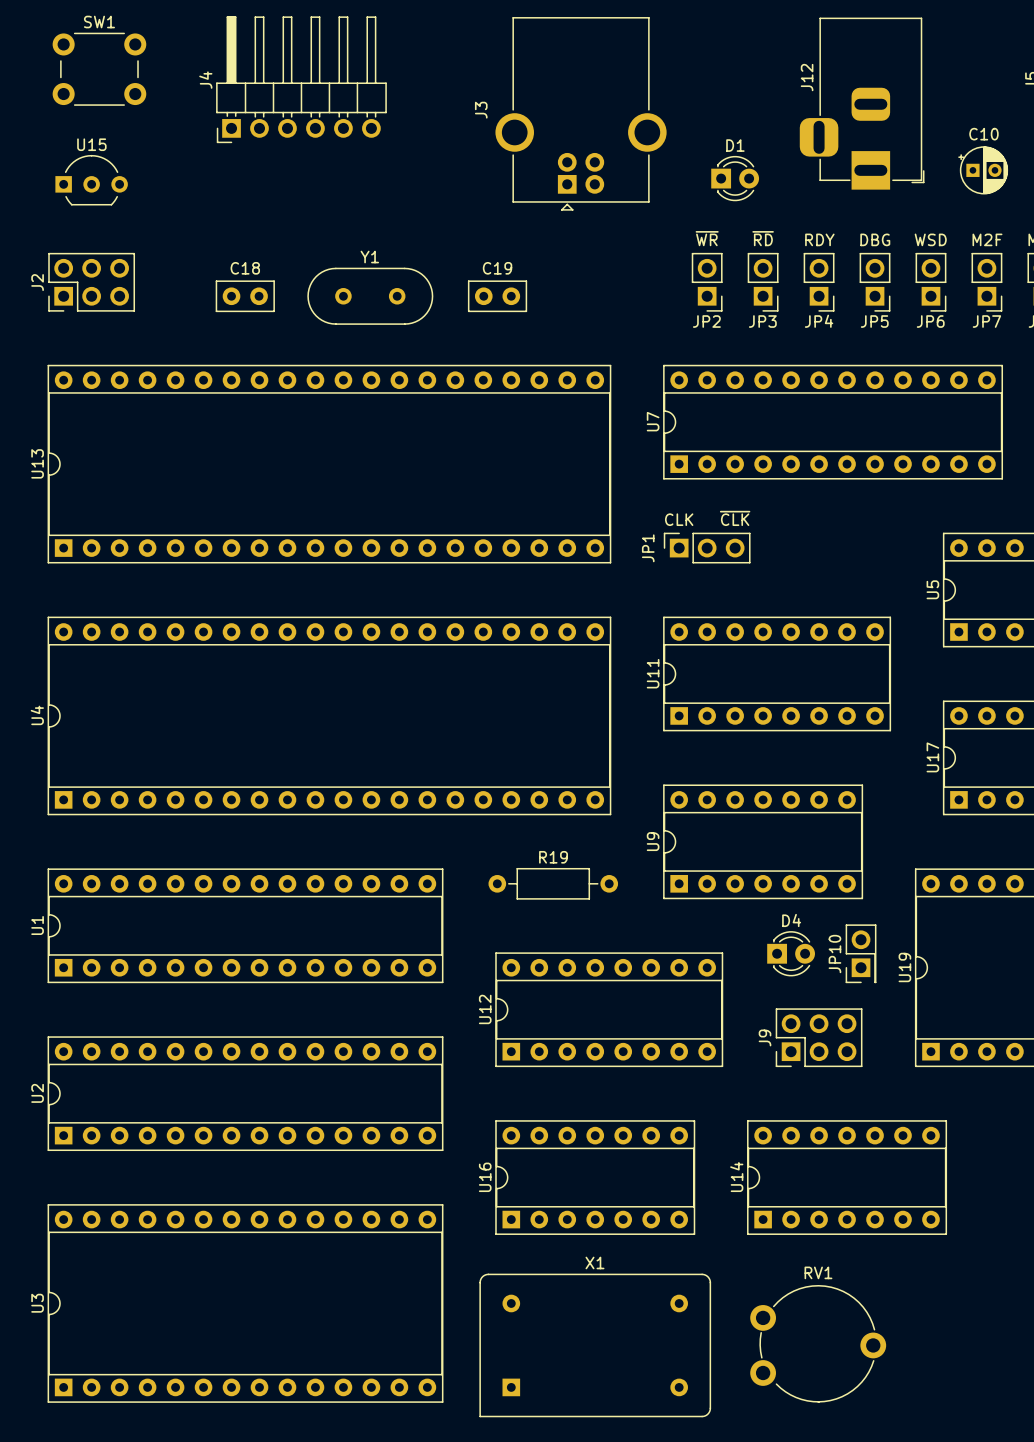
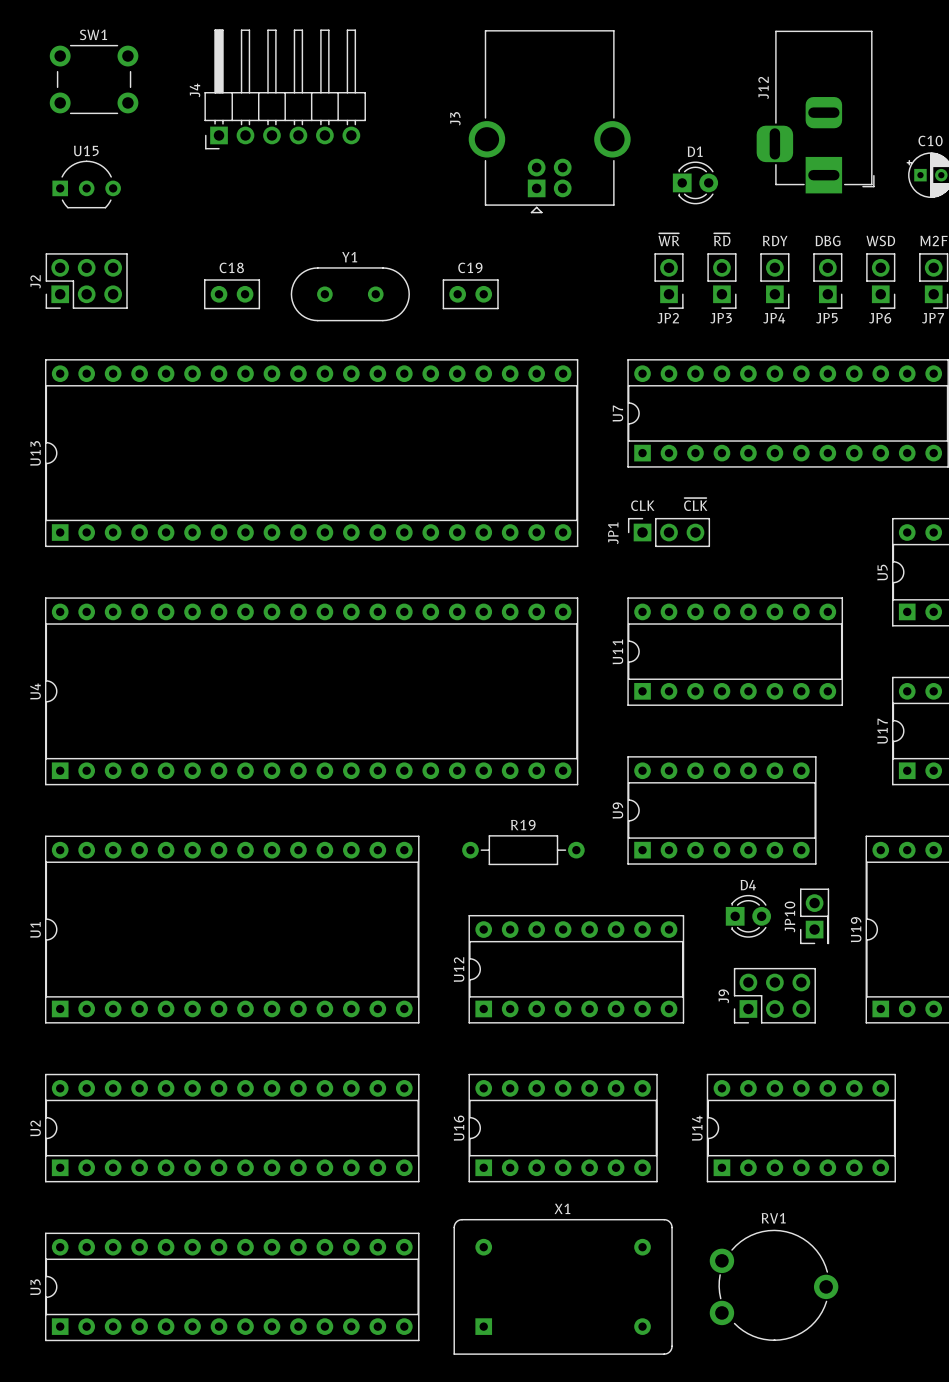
U1 footprint: [47, 868, 444, 984] -> [45, 835, 420, 1024]
U2 position: (245, 1093) -> (232, 1128)
U3 footprint: [47, 1204, 444, 1403] -> [45, 1232, 420, 1342]

